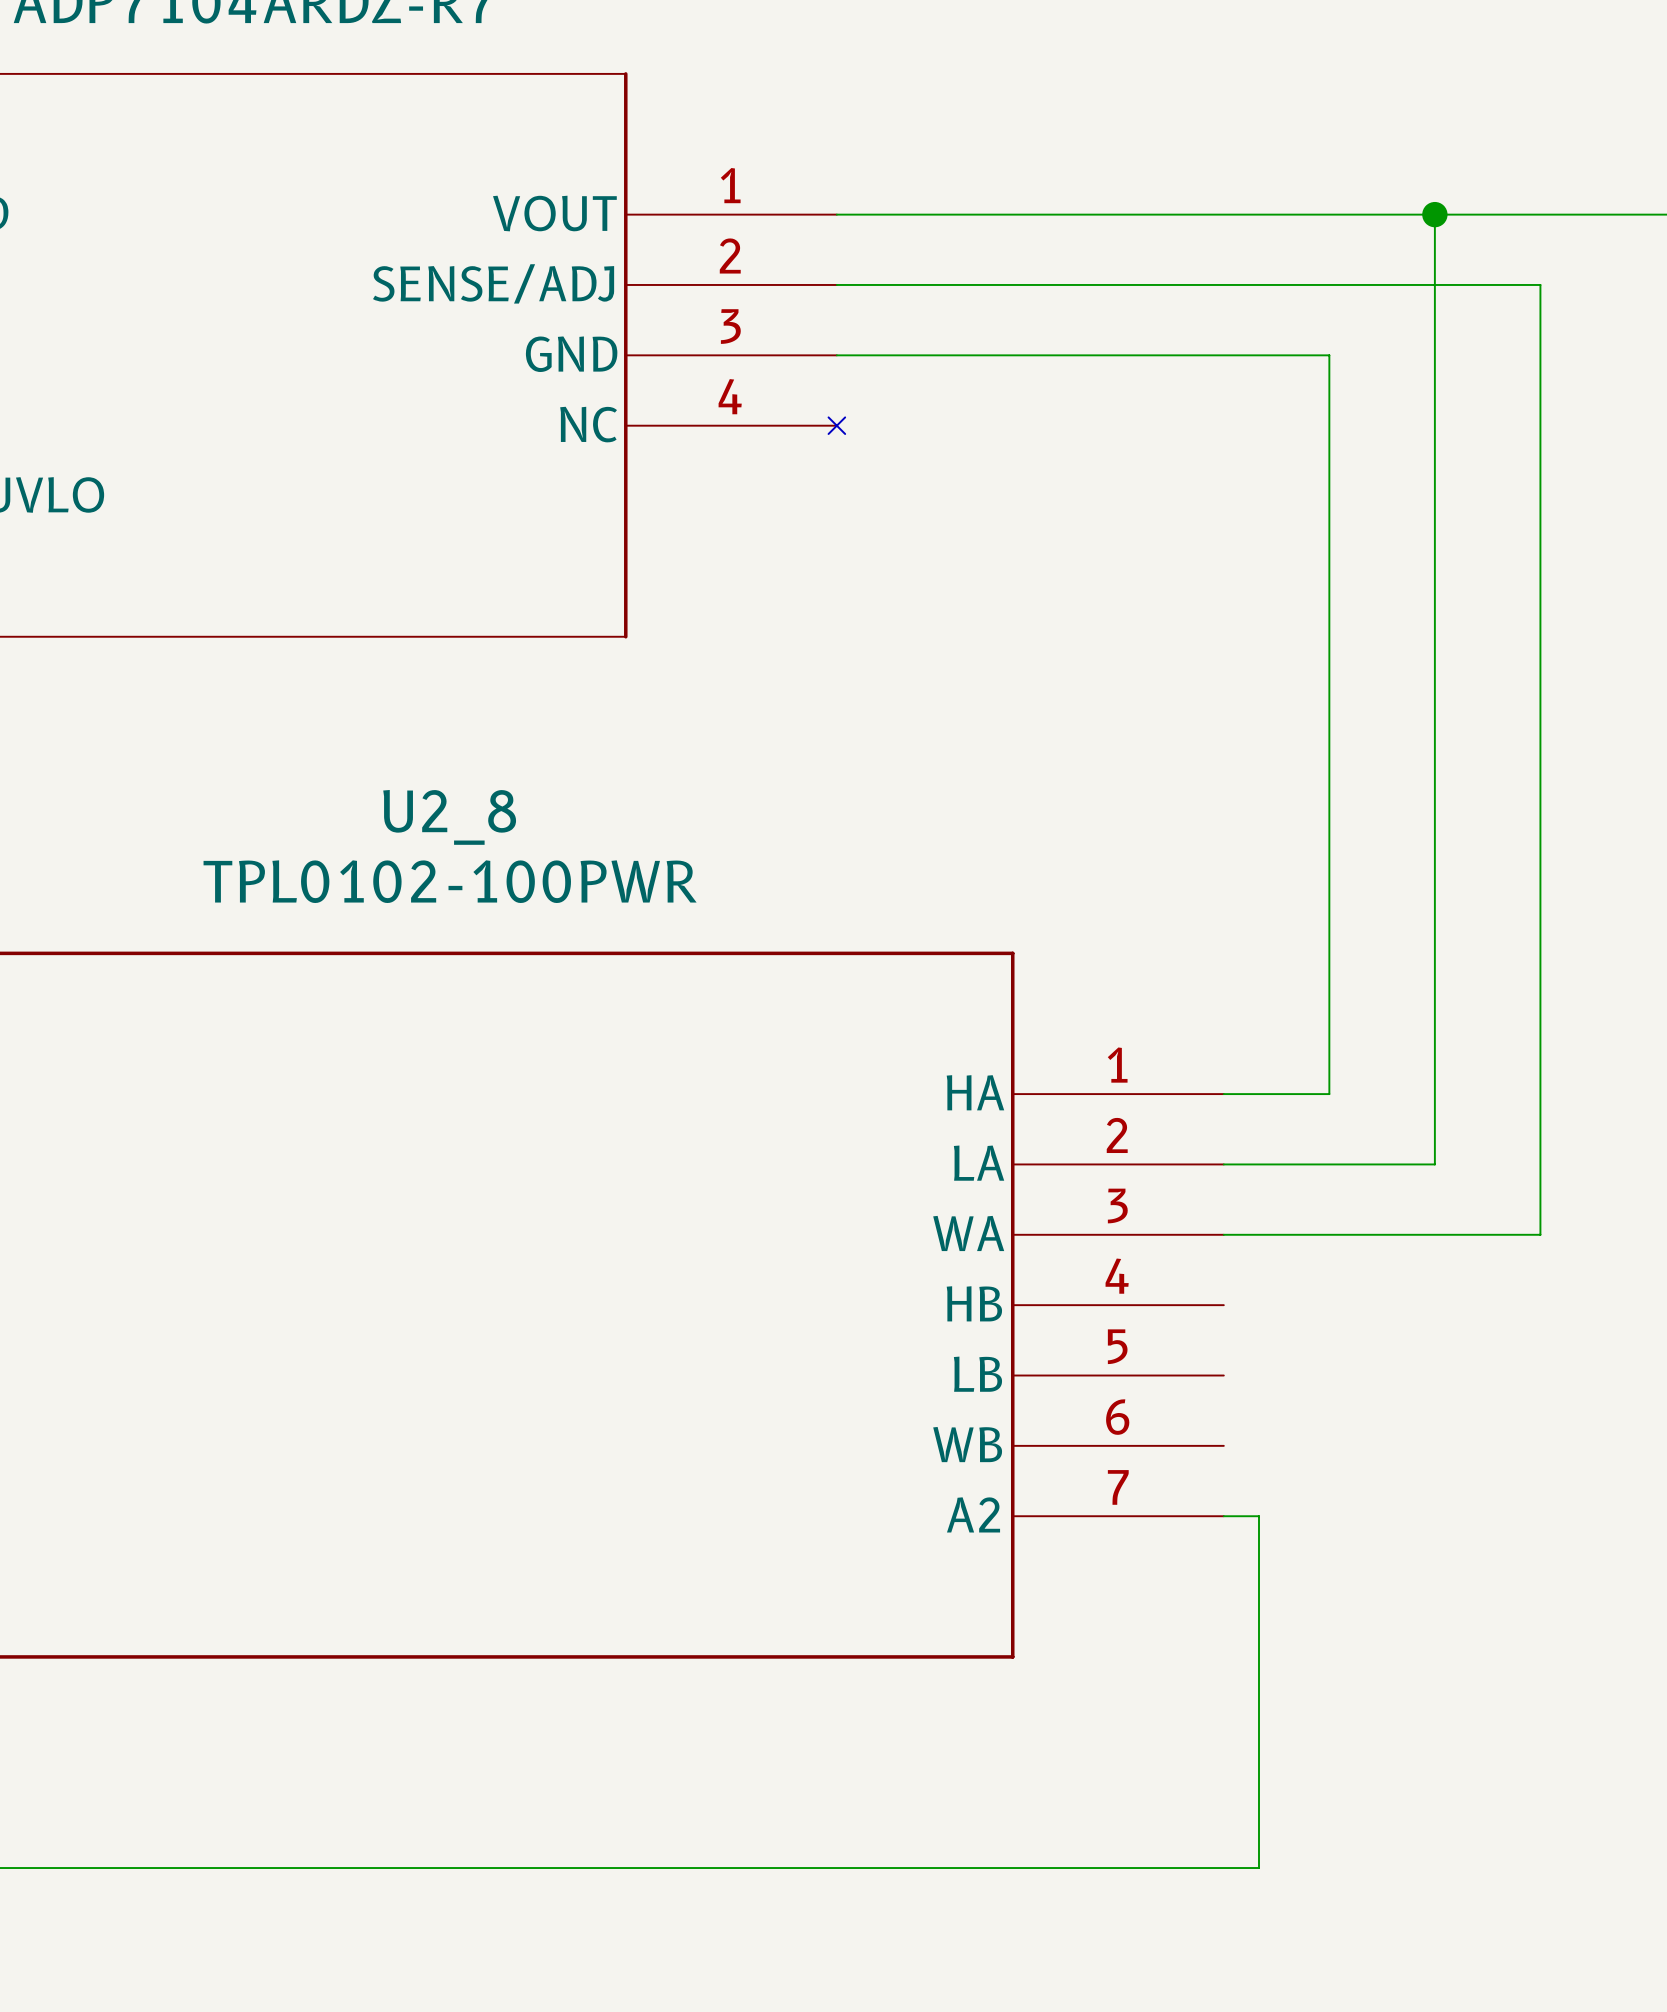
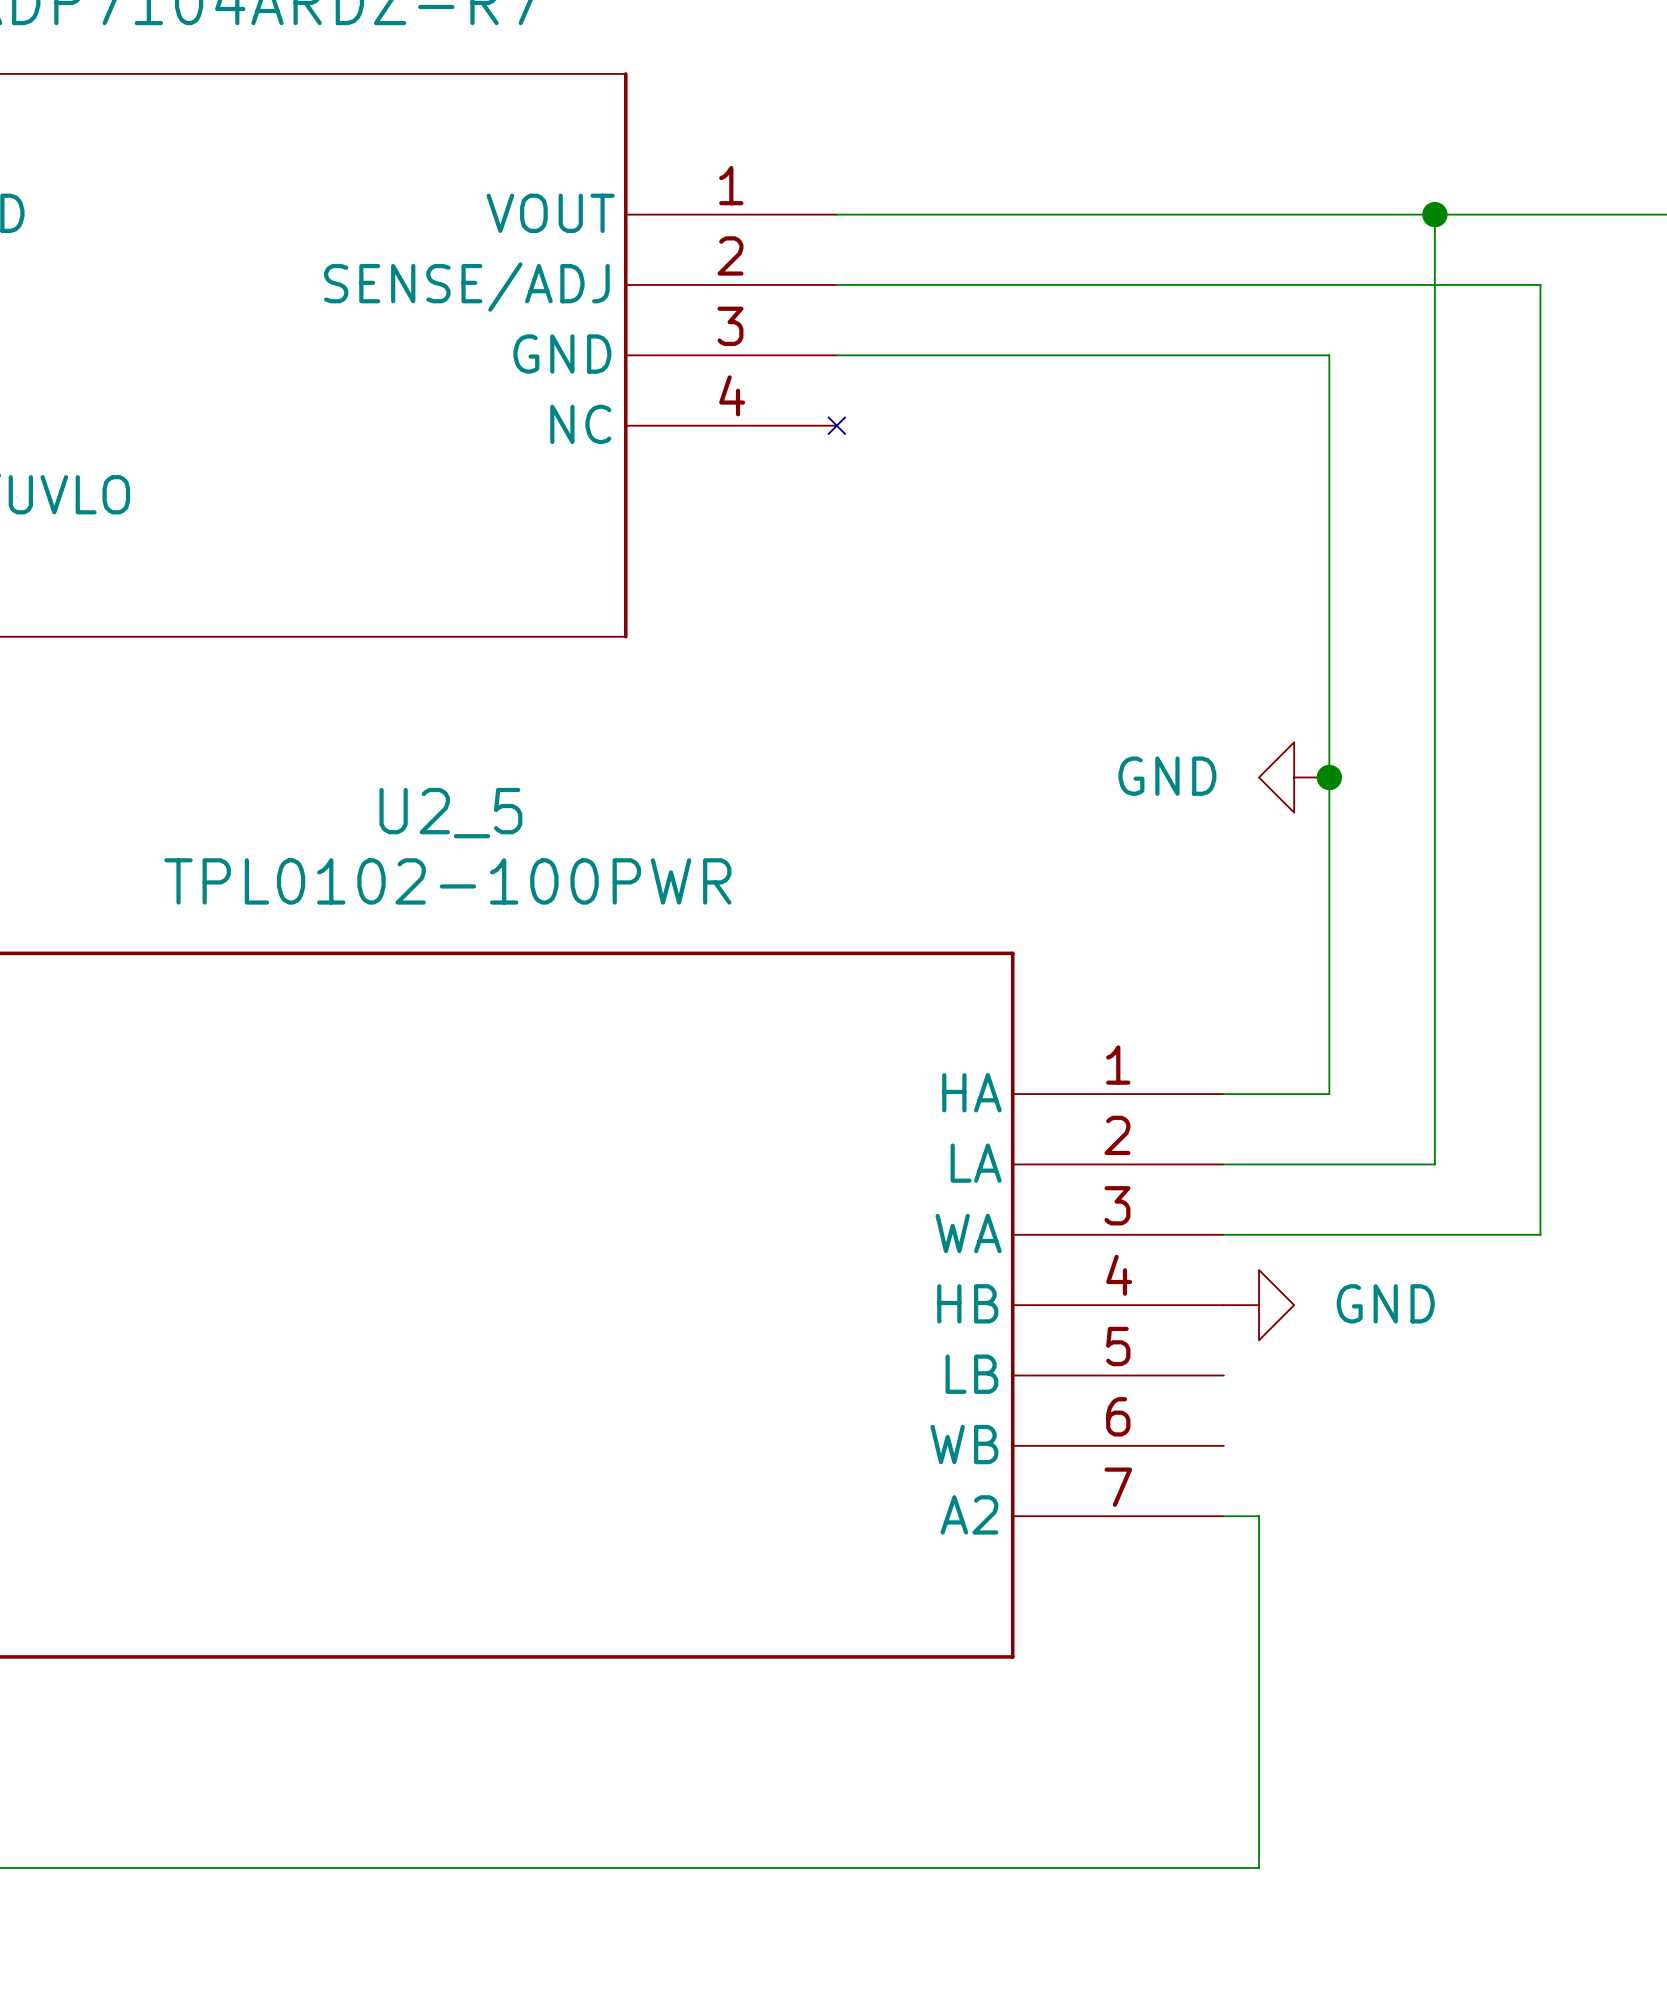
power symbol: none -> GND (1294, 777)
junction: none -> (1329, 777)
U2_8 name: U2_8 (449, 817) -> U2_5 (450, 813)
power symbol: none -> GND (1259, 1305)

